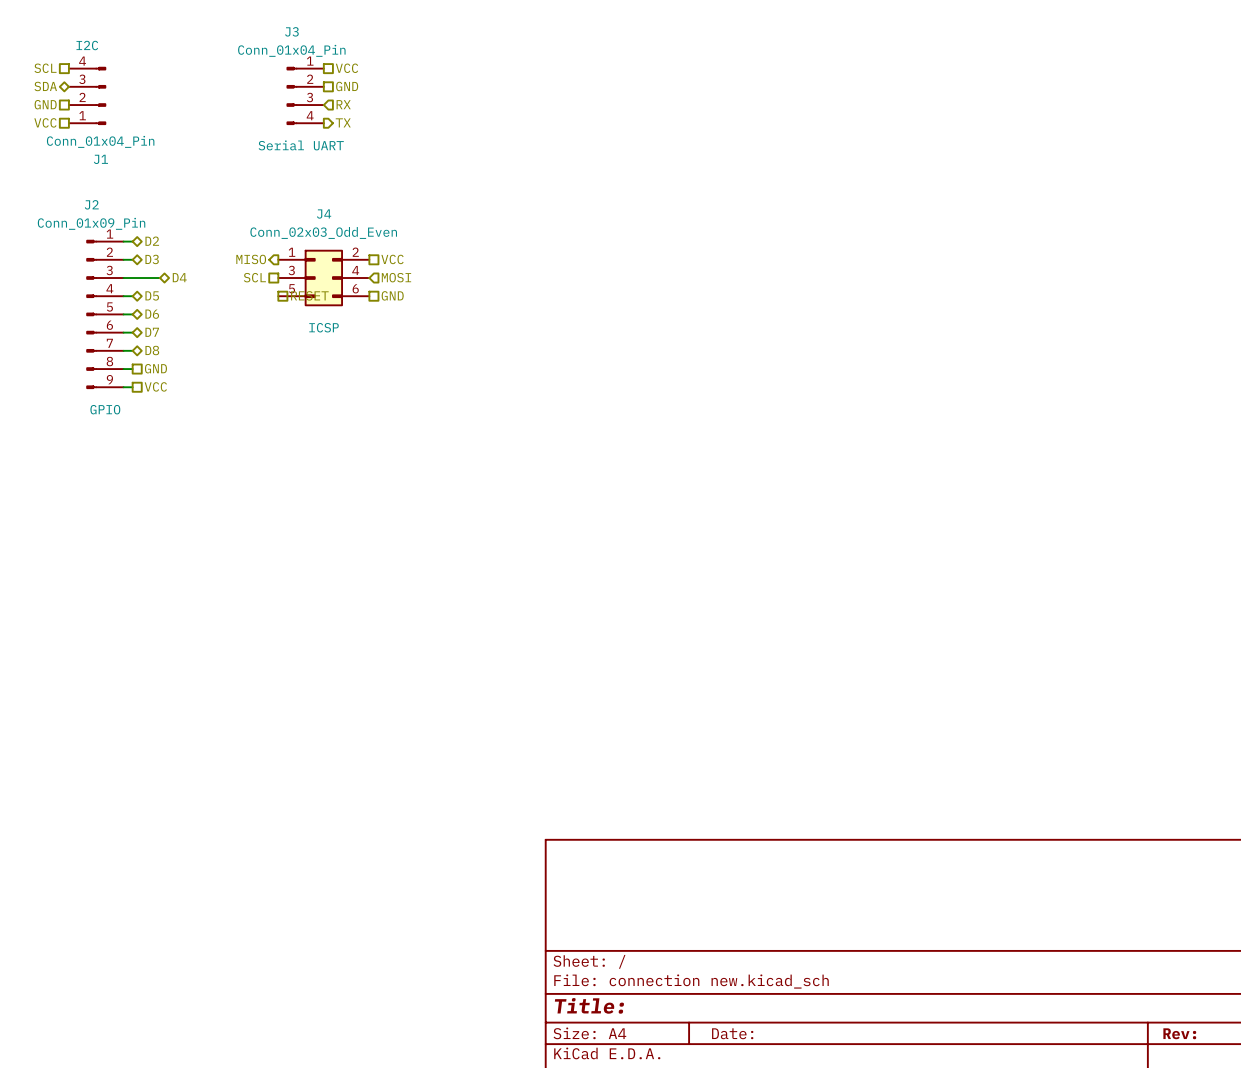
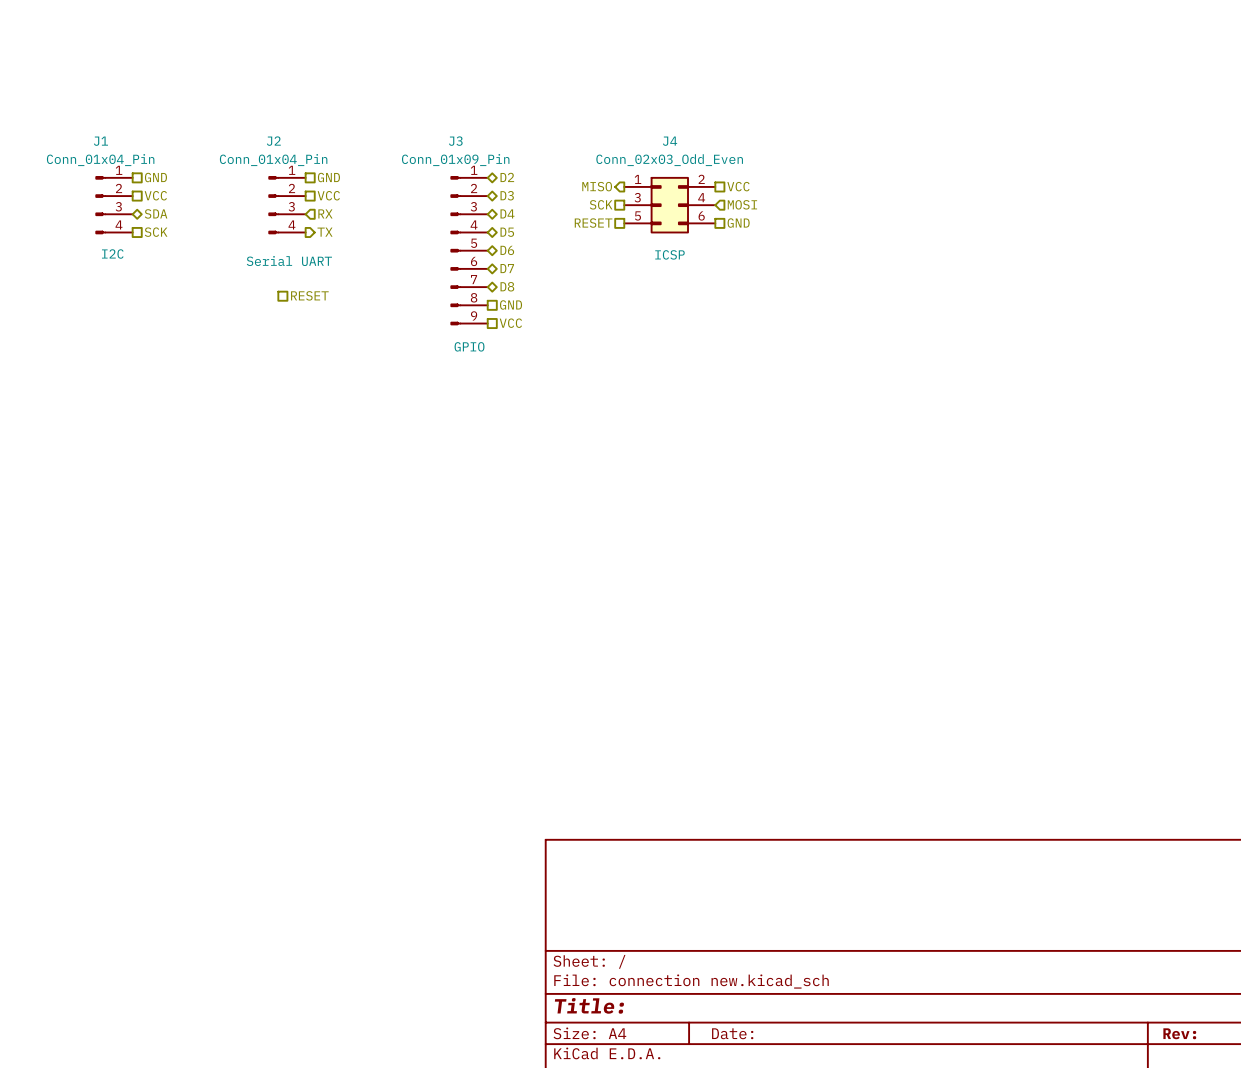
J3 name position: J3 (291, 31) -> J3 (455, 141)
J3 value: Conn_01x04_Pin (291, 50) -> Conn_01x09_Pin (455, 160)
J3 symbol: [286, 67, 324, 125] -> [450, 176, 488, 325]
hierarchical label: SCL (45, 68) -> none
hierarchical label: VCC (346, 68) -> none
hierarchical label rotation: 0° (45, 86) -> 180° (156, 213)
hierarchical label position: SDA (45, 86) -> SDA (156, 213)
hierarchical label: GND (347, 86) -> none
J1 position: (87, 95) -> (114, 205)
J1 rotation: 0° (100, 95) -> 180° (100, 205)
hierarchical label: GND (45, 104) -> none
hierarchical label position: RX (343, 104) -> RX (325, 213)
hierarchical label: VCC (45, 122) -> none
hierarchical label position: TX (343, 122) -> TX (325, 232)
J3 text: Serial UART (301, 145) -> GPIO (469, 346)
hierarchical label: none -> GND (155, 177)
hierarchical label: none -> GND (328, 177)
hierarchical label: none -> D2 (507, 177)
hierarchical label: none -> MISO (597, 186)
hierarchical label: none -> VCC (738, 186)
hierarchical label: none -> VCC (155, 195)
hierarchical label: none -> VCC (328, 195)
hierarchical label: none -> D3 (507, 195)
J2 name position: J2 (91, 204) -> J2 (273, 141)
hierarchical label: none -> SCK (601, 204)
hierarchical label: none -> MOSI (742, 204)
hierarchical label: none -> D4 (507, 213)
J2 value: Conn_01x09_Pin (91, 223) -> Conn_01x04_Pin (273, 160)
hierarchical label: none -> RESET (593, 223)
hierarchical label: none -> GND (738, 223)
hierarchical label: none -> SCK (156, 232)
hierarchical label: none -> D5 (507, 232)
J2 symbol: [86, 240, 124, 389] -> [268, 176, 306, 234]
wire: (123, 241) (132, 241) -> none
hierarchical label: D2 (152, 241) -> none
hierarchical label: none -> D6 (507, 250)
wire: (123, 259) (132, 259) -> none
hierarchical label: D3 (152, 259) -> none
hierarchical label: MISO (251, 259) -> none
hierarchical label: VCC (392, 259) -> none
hierarchical label: none -> D7 (507, 268)
hierarchical label: D4 (179, 277) -> none
hierarchical label: SCL (254, 277) -> none
hierarchical label: MOSI (396, 277) -> none
wire: (123, 278) (159, 278) -> none
J4 position: (323, 278) -> (669, 205)
hierarchical label: none -> D8 (507, 286)
hierarchical label: D5 (152, 295) -> none
hierarchical label: GND (392, 295) -> none
wire: (123, 296) (132, 296) -> none
hierarchical label: none -> GND (511, 304)
wire: (123, 314) (132, 314) -> none
hierarchical label: D6 (152, 314) -> none
hierarchical label: none -> VCC (510, 323)
wire: (123, 332) (132, 332) -> none
hierarchical label: D7 (152, 332) -> none
wire: (123, 350) (132, 350) -> none
hierarchical label: D8 (152, 350) -> none
hierarchical label: GND (155, 368) -> none
wire: (123, 369) (132, 369) -> none
hierarchical label: VCC (155, 386) -> none
wire: (123, 387) (132, 387) -> none
J2 text: GPIO (105, 409) -> Serial UART (289, 261)

